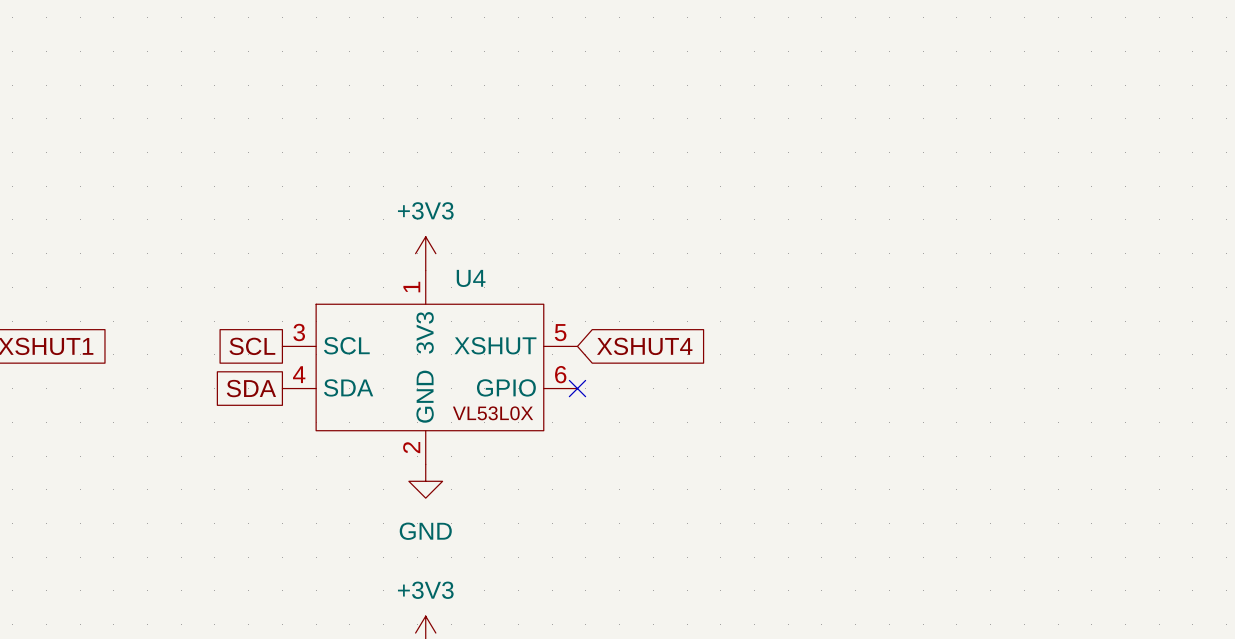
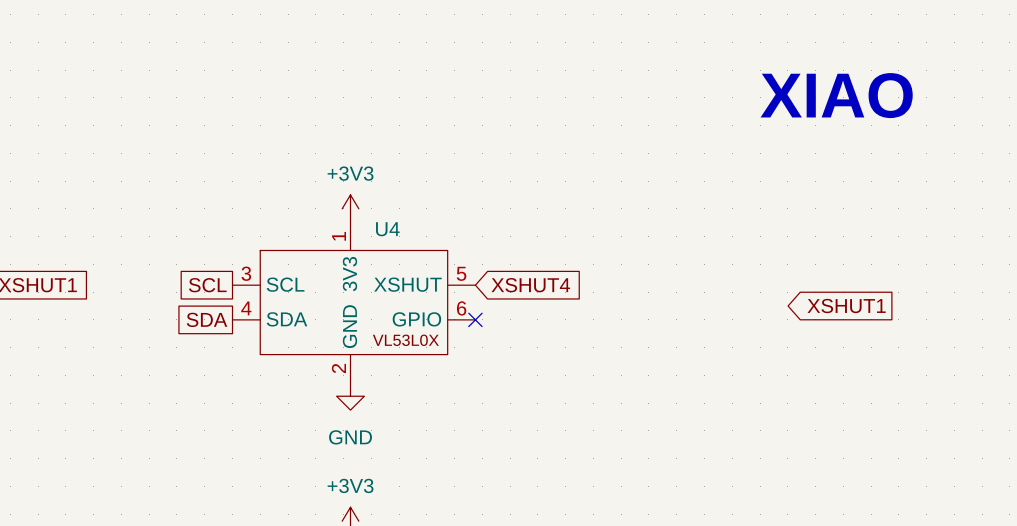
text: none -> XIAO (836, 95)
global label: none -> XSHUT1 (846, 306)

